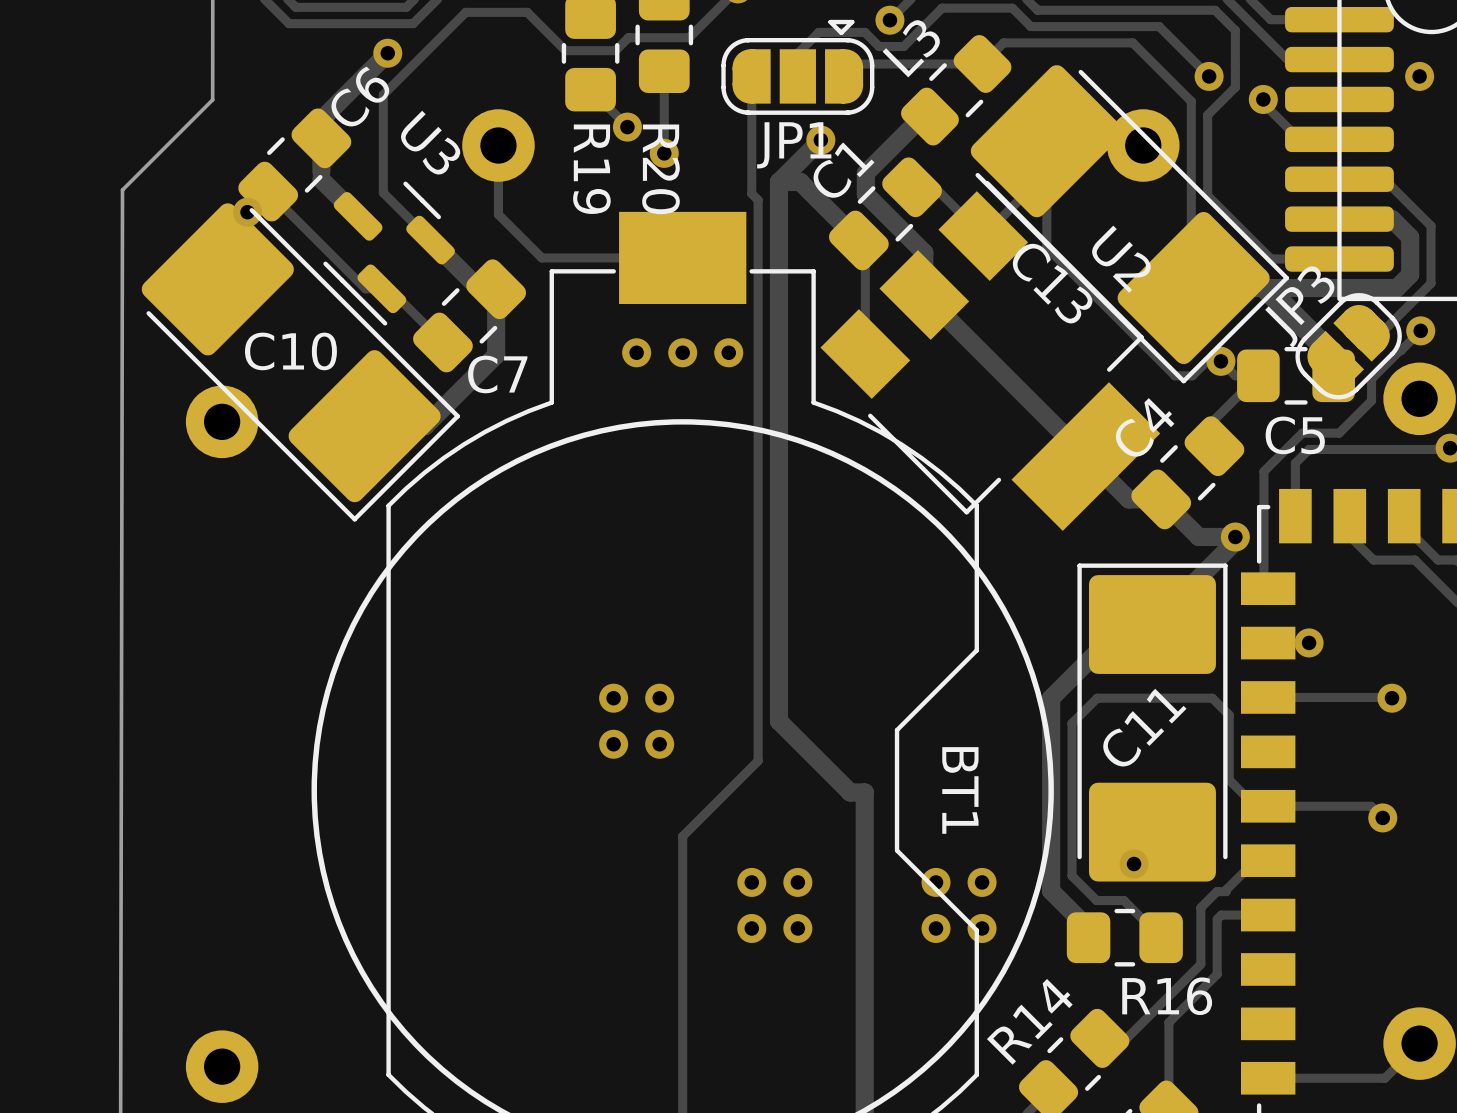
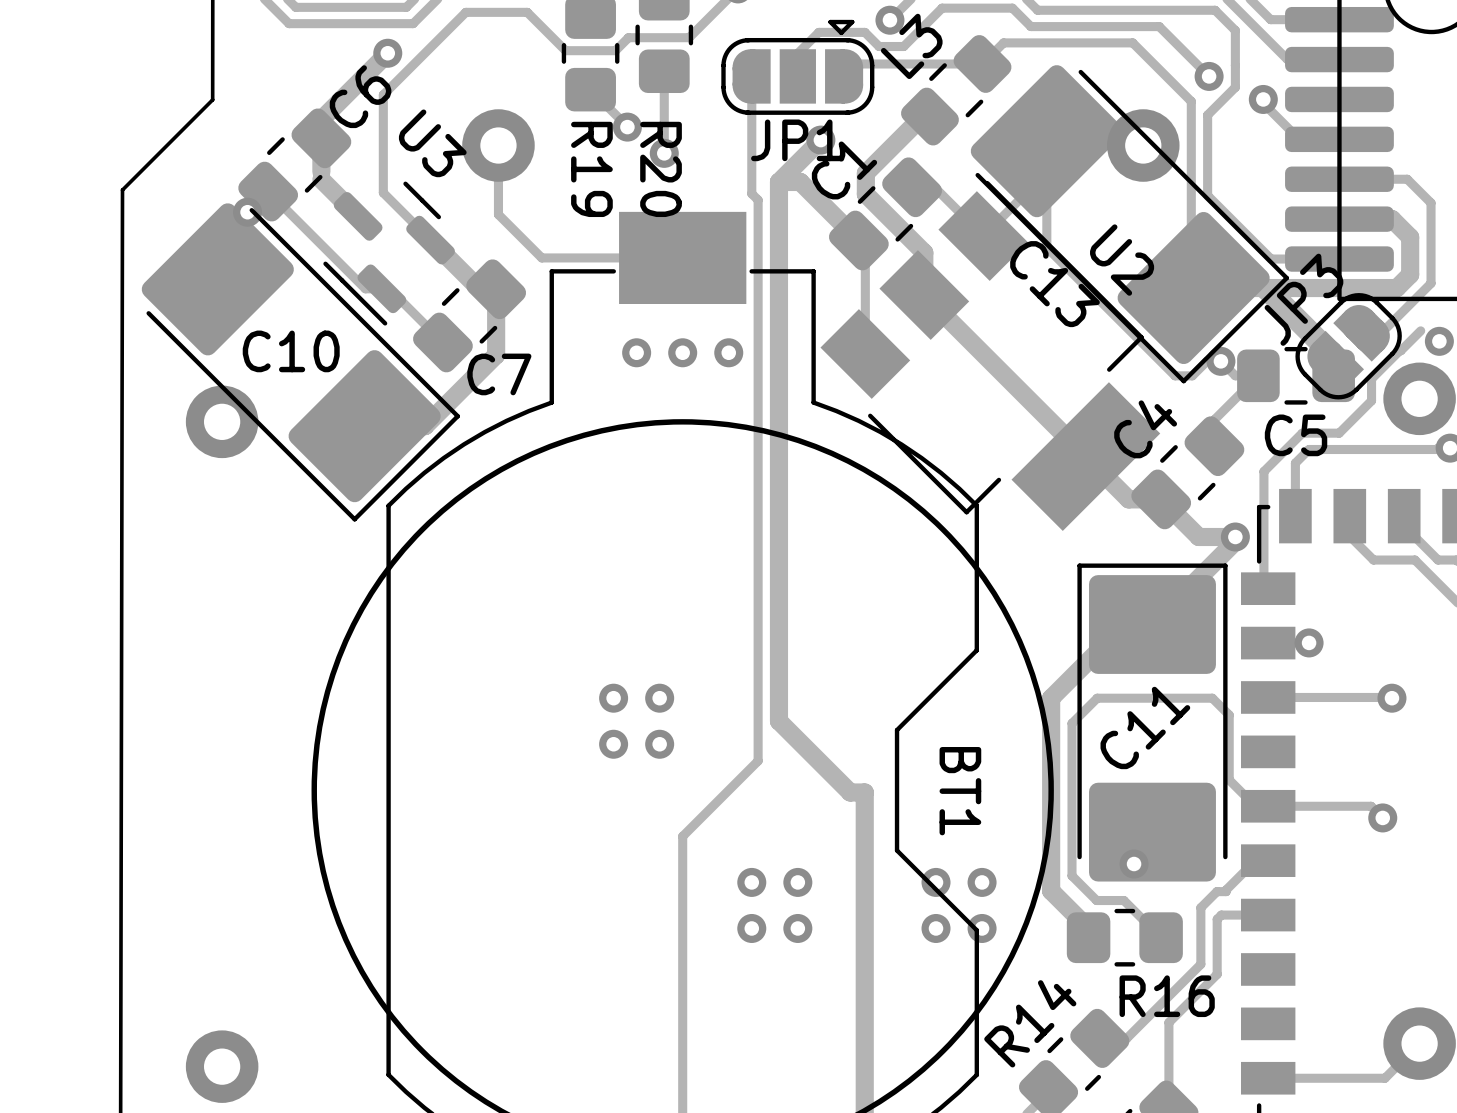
via: (1419, 76) -> none
track: (1384, 179) (1431, 226) -> (1384, 179) (1407, 179) (1431, 202) (1431, 226)
via position: (1420, 330) -> (1439, 341)

